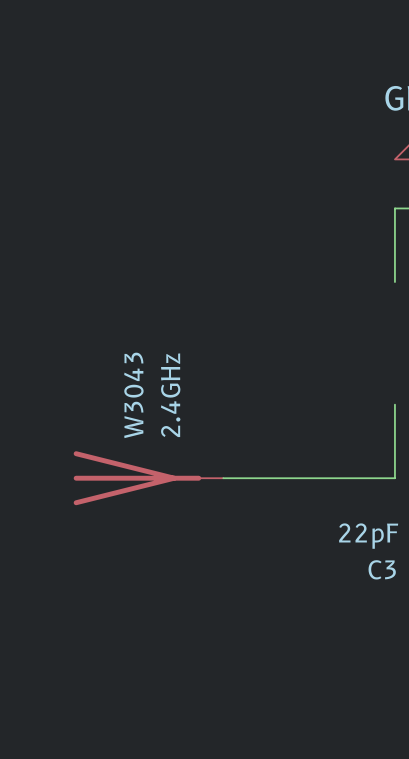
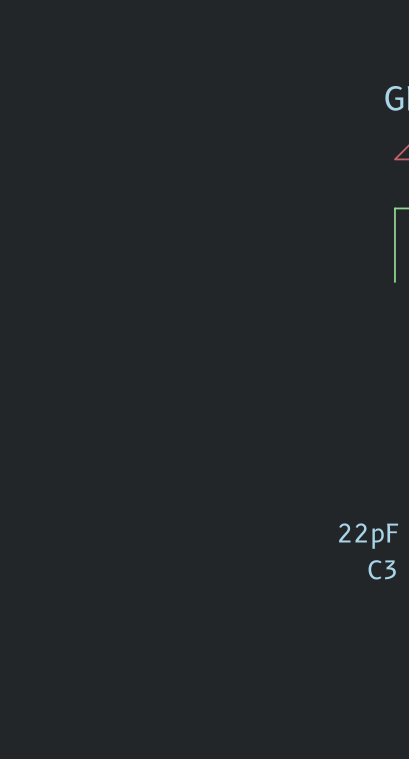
wire: (394, 404) (394, 478) (223, 478) -> none
W3043: 2.4GHz (148, 478) -> none

